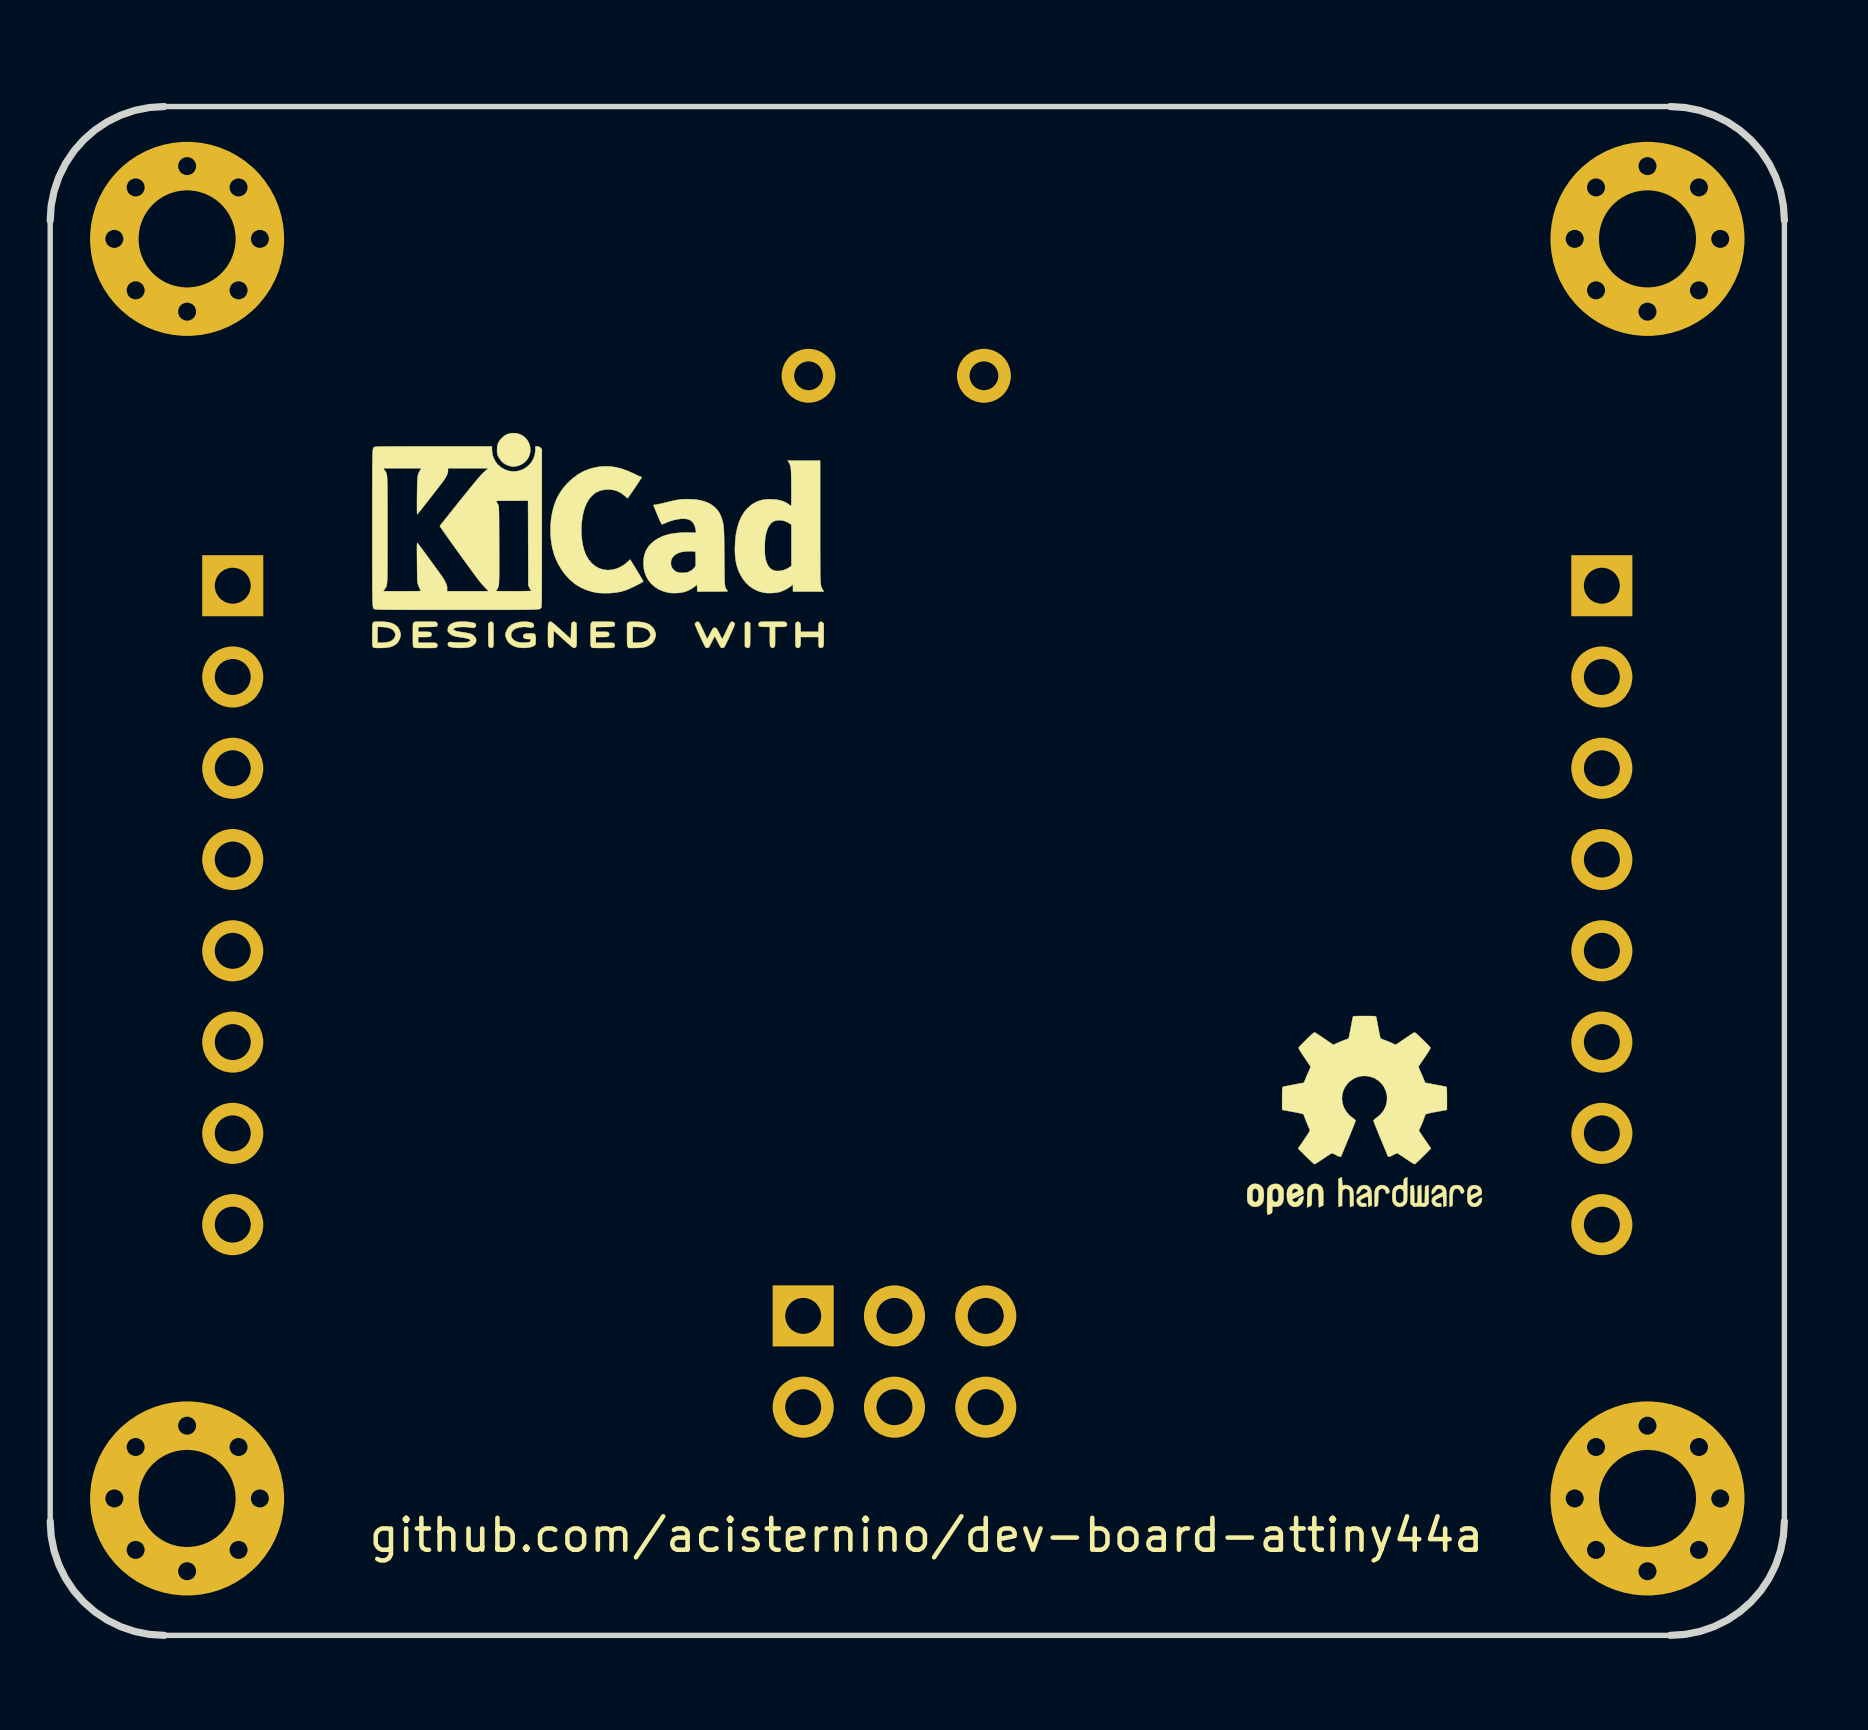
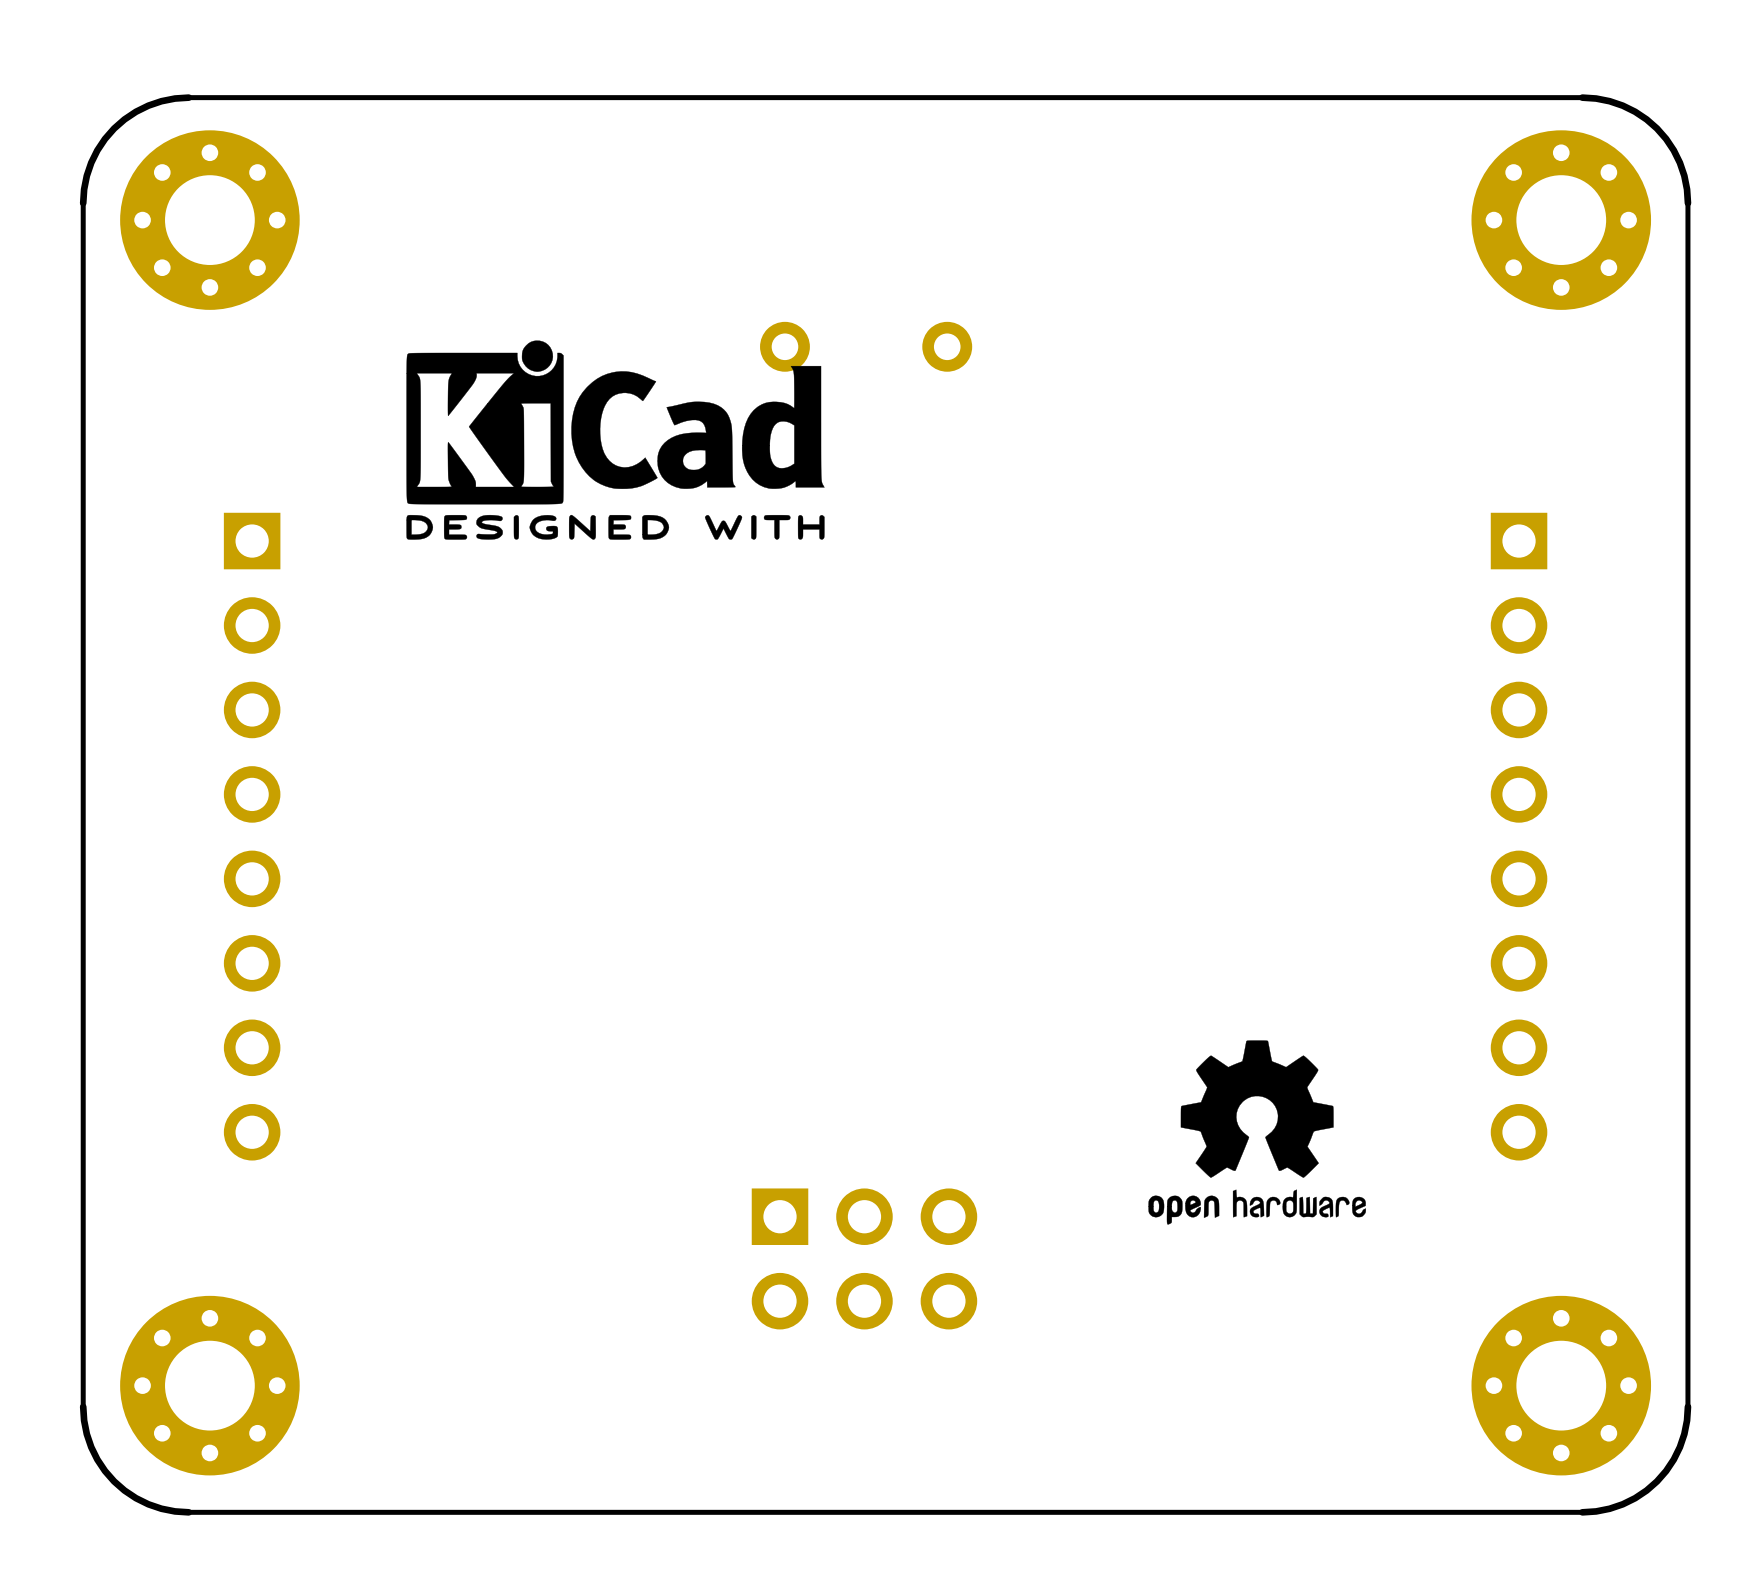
drawing position: (598, 540) -> (615, 440)
drawing position: (1364, 1115) -> (1257, 1132)
text: github.com/acisternino/dev-board-attiny44a (925, 1538) -> none

